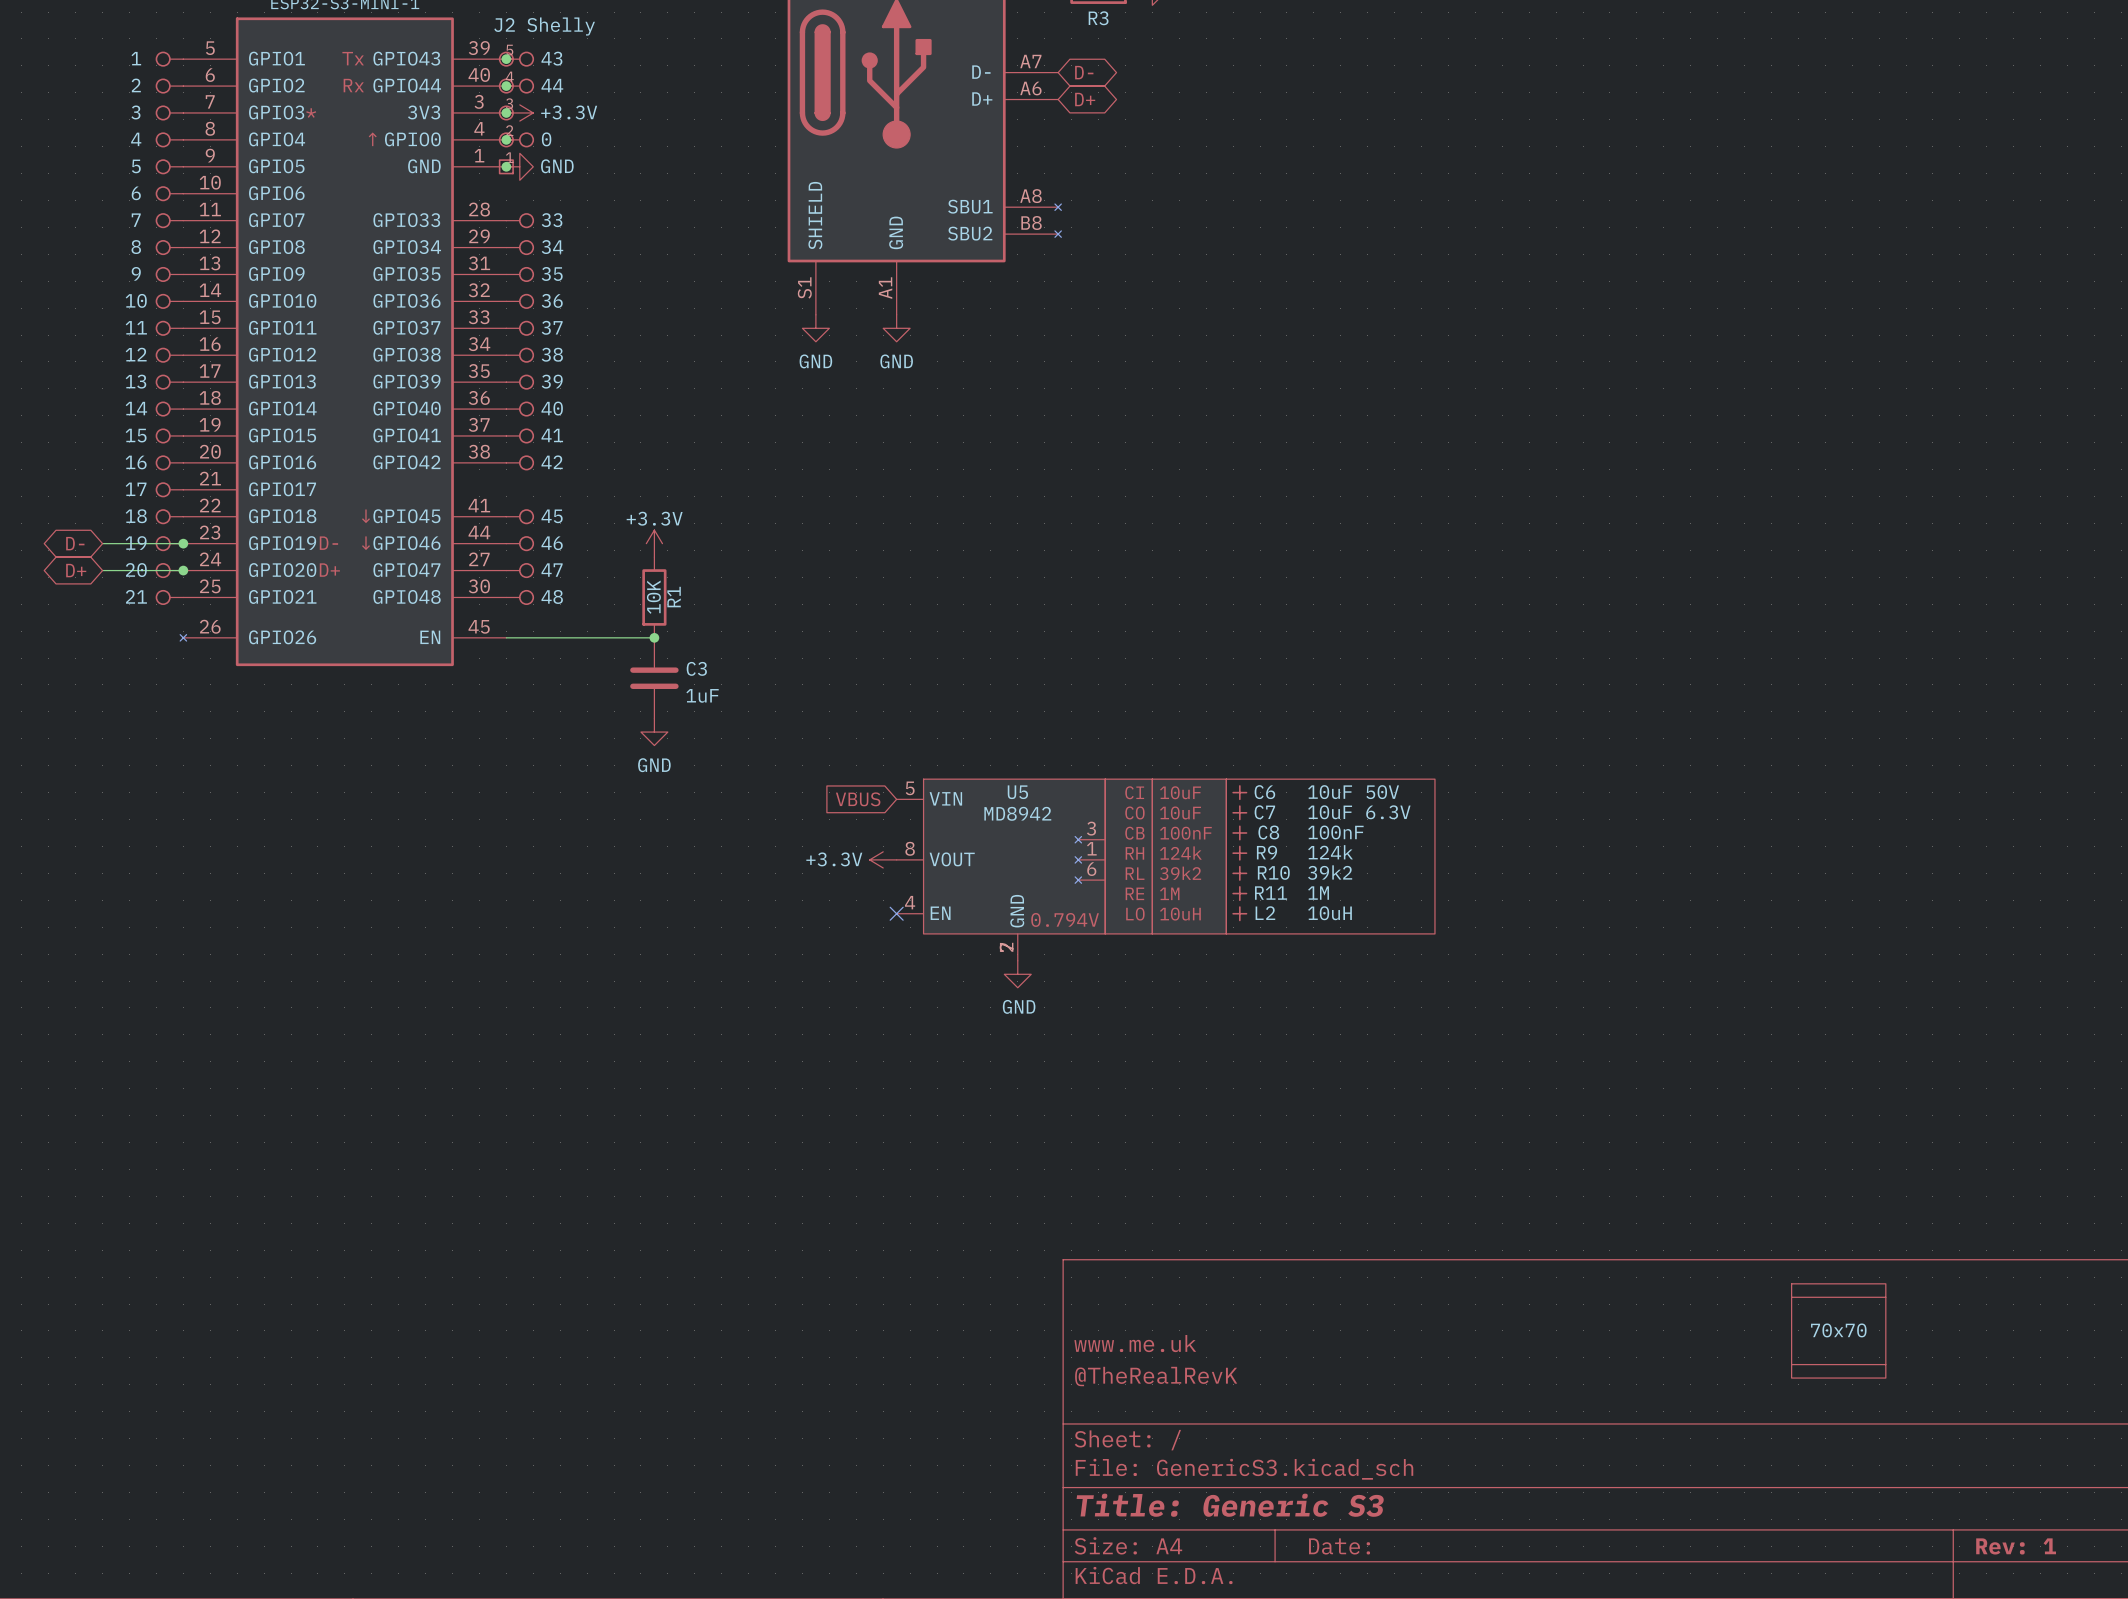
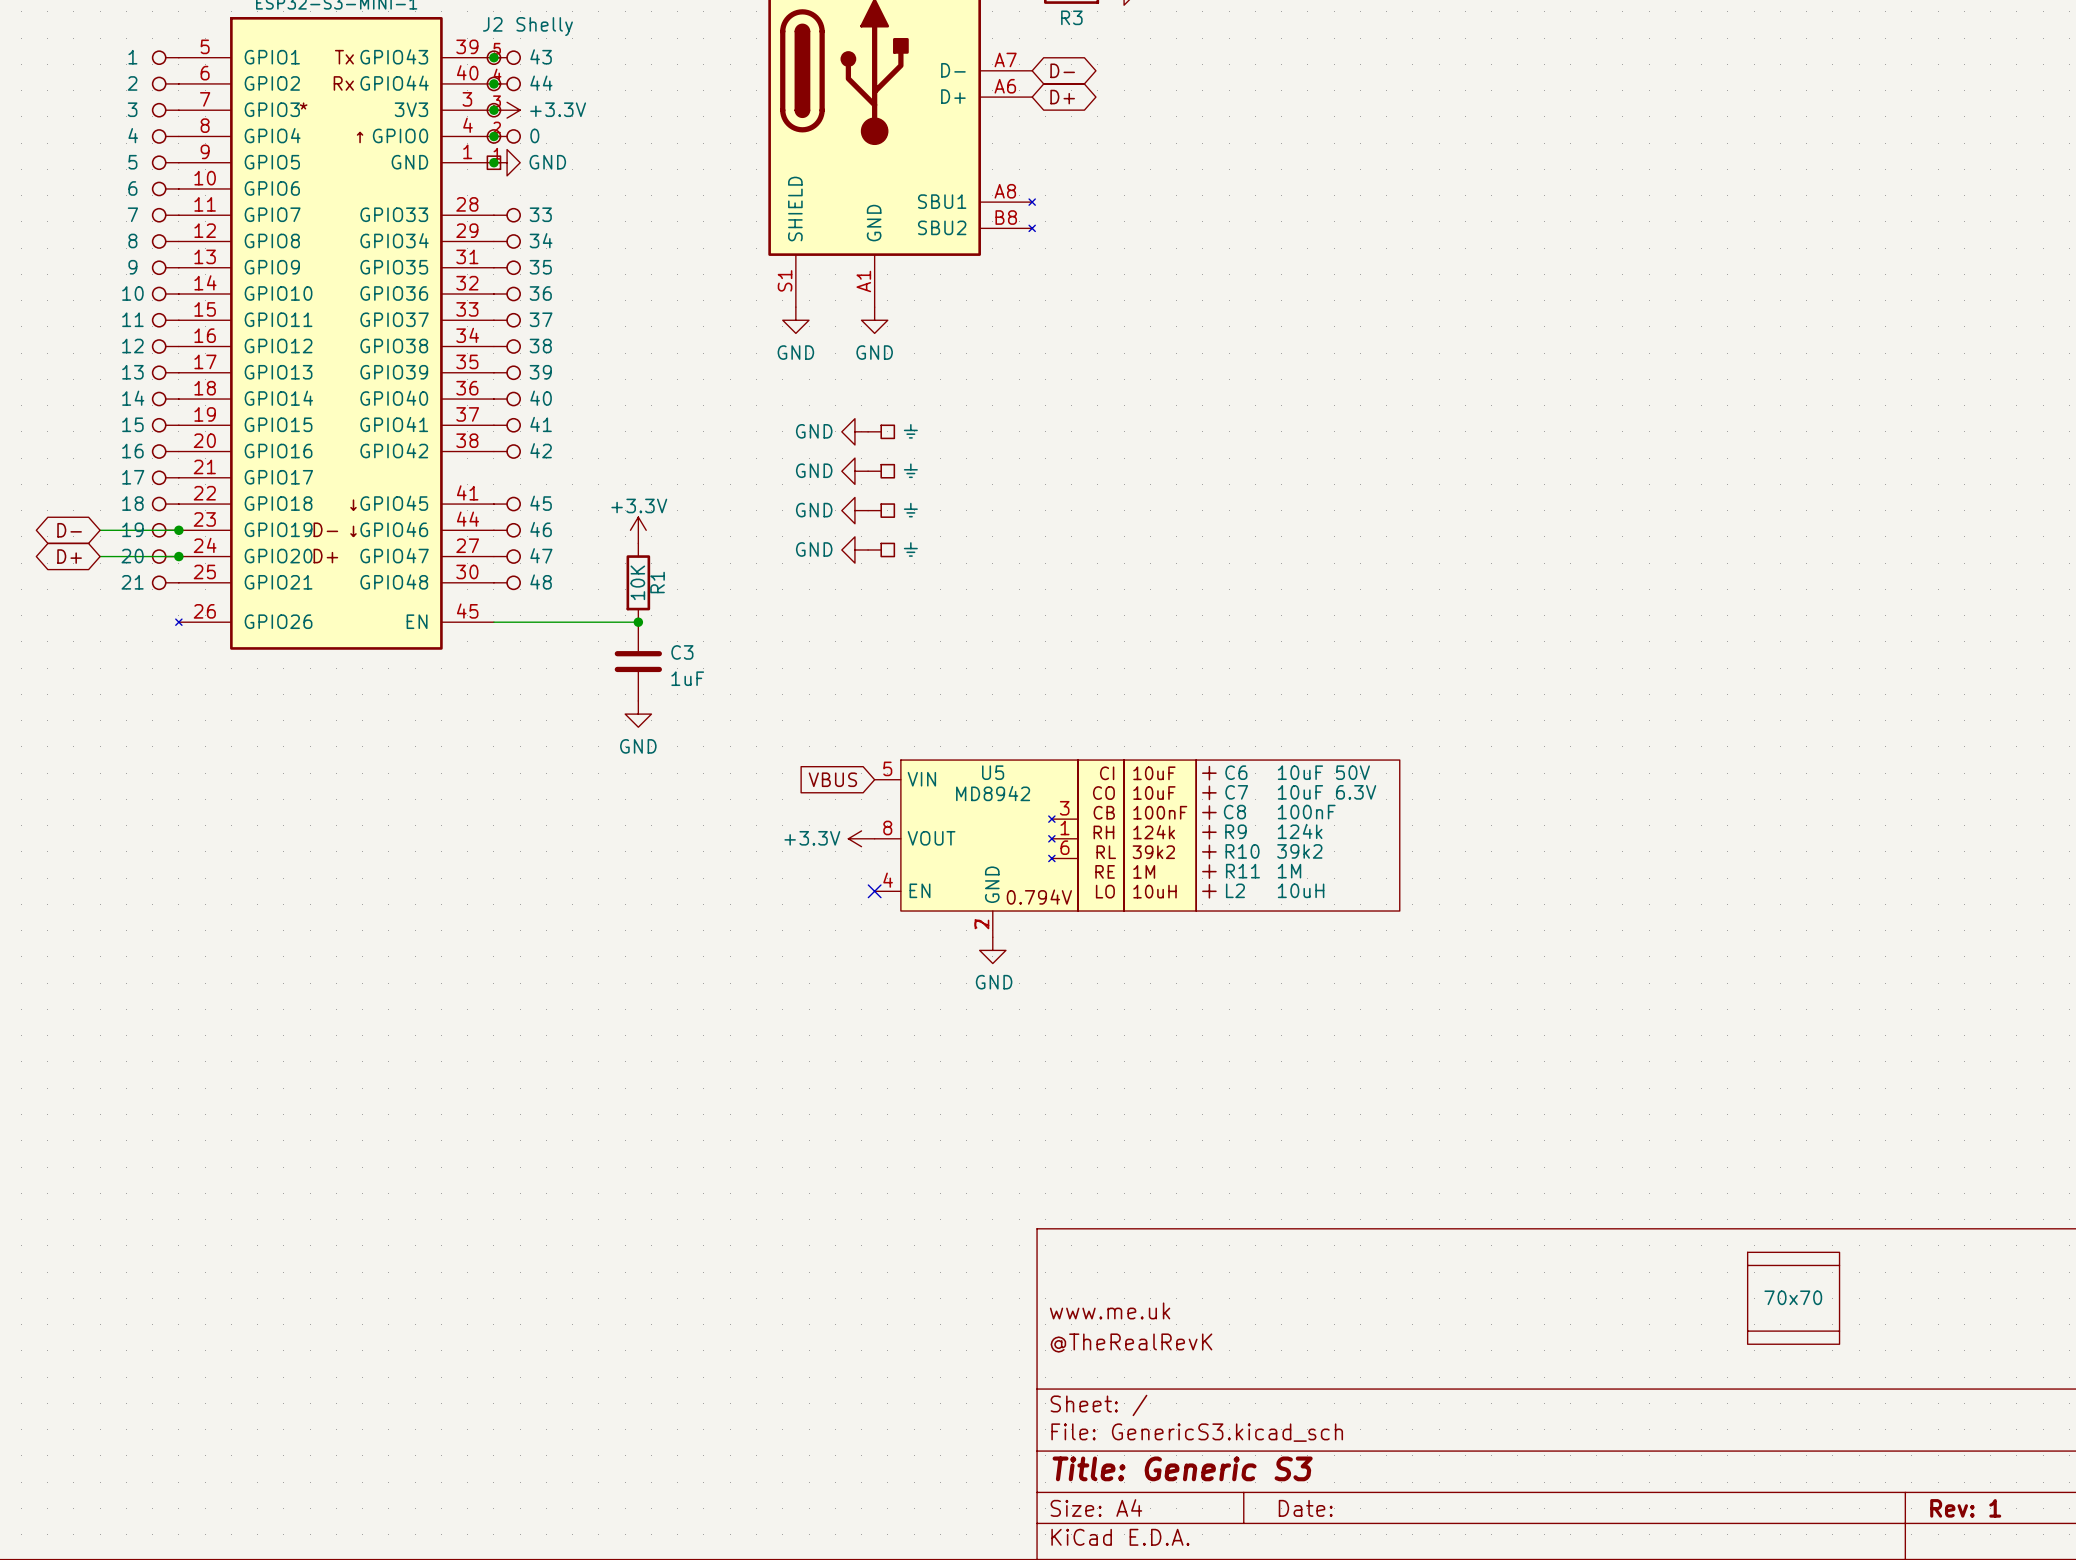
power symbol: none -> GND (854, 431)
part: none -> ⏚ (881, 431)
power symbol: none -> GND (854, 471)
part: none -> ⏚ (881, 471)
power symbol: none -> GND (854, 510)
part: none -> ⏚ (881, 510)
power symbol: none -> GND (854, 549)
part: none -> ⏚ (881, 549)

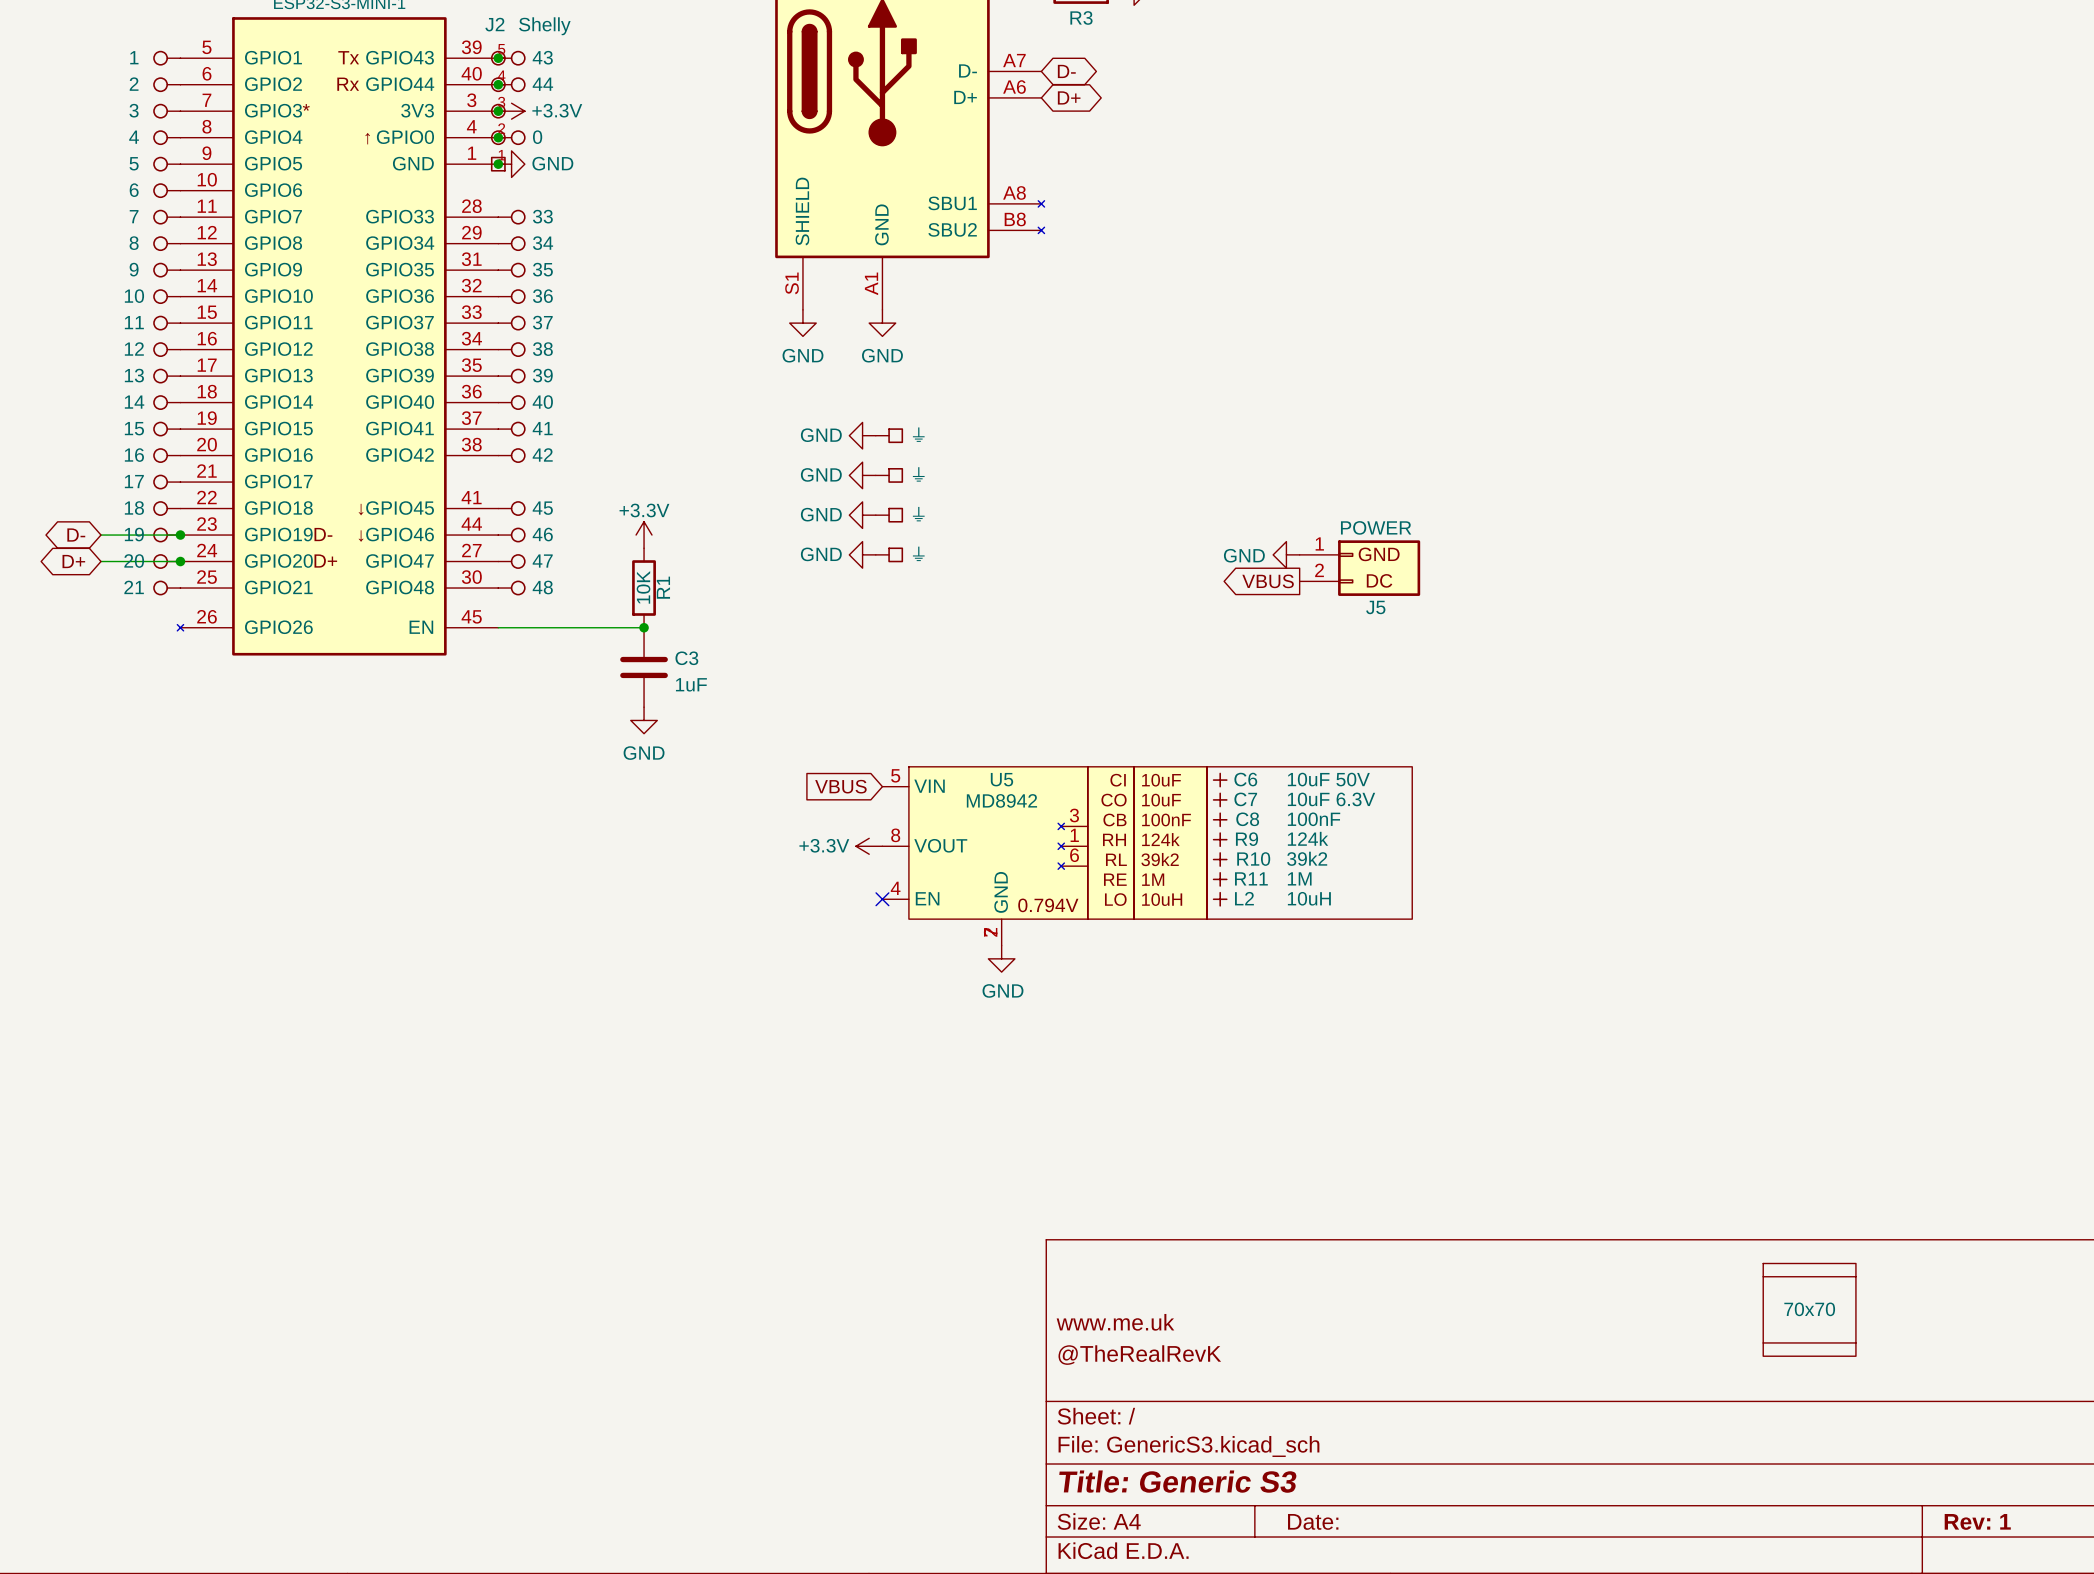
power symbol: none -> GND (1286, 554)
J5: none -> POWER (1359, 568)
global label: none -> VBUS (1268, 581)

